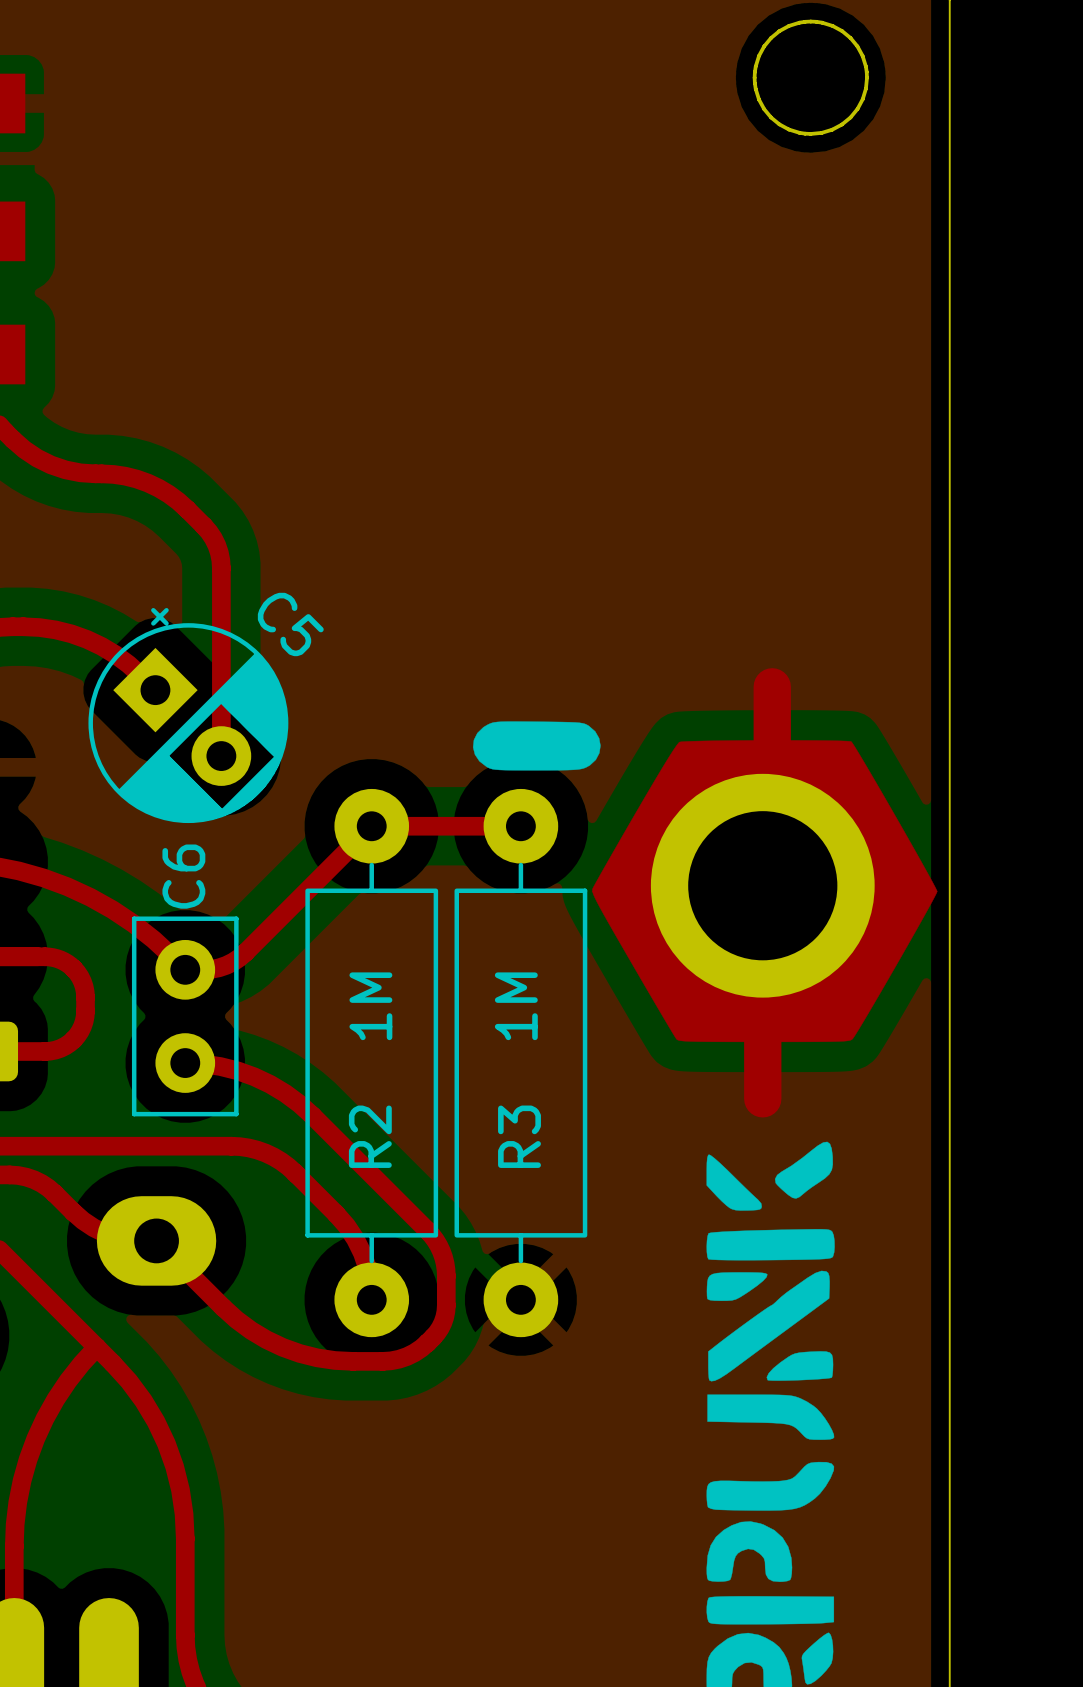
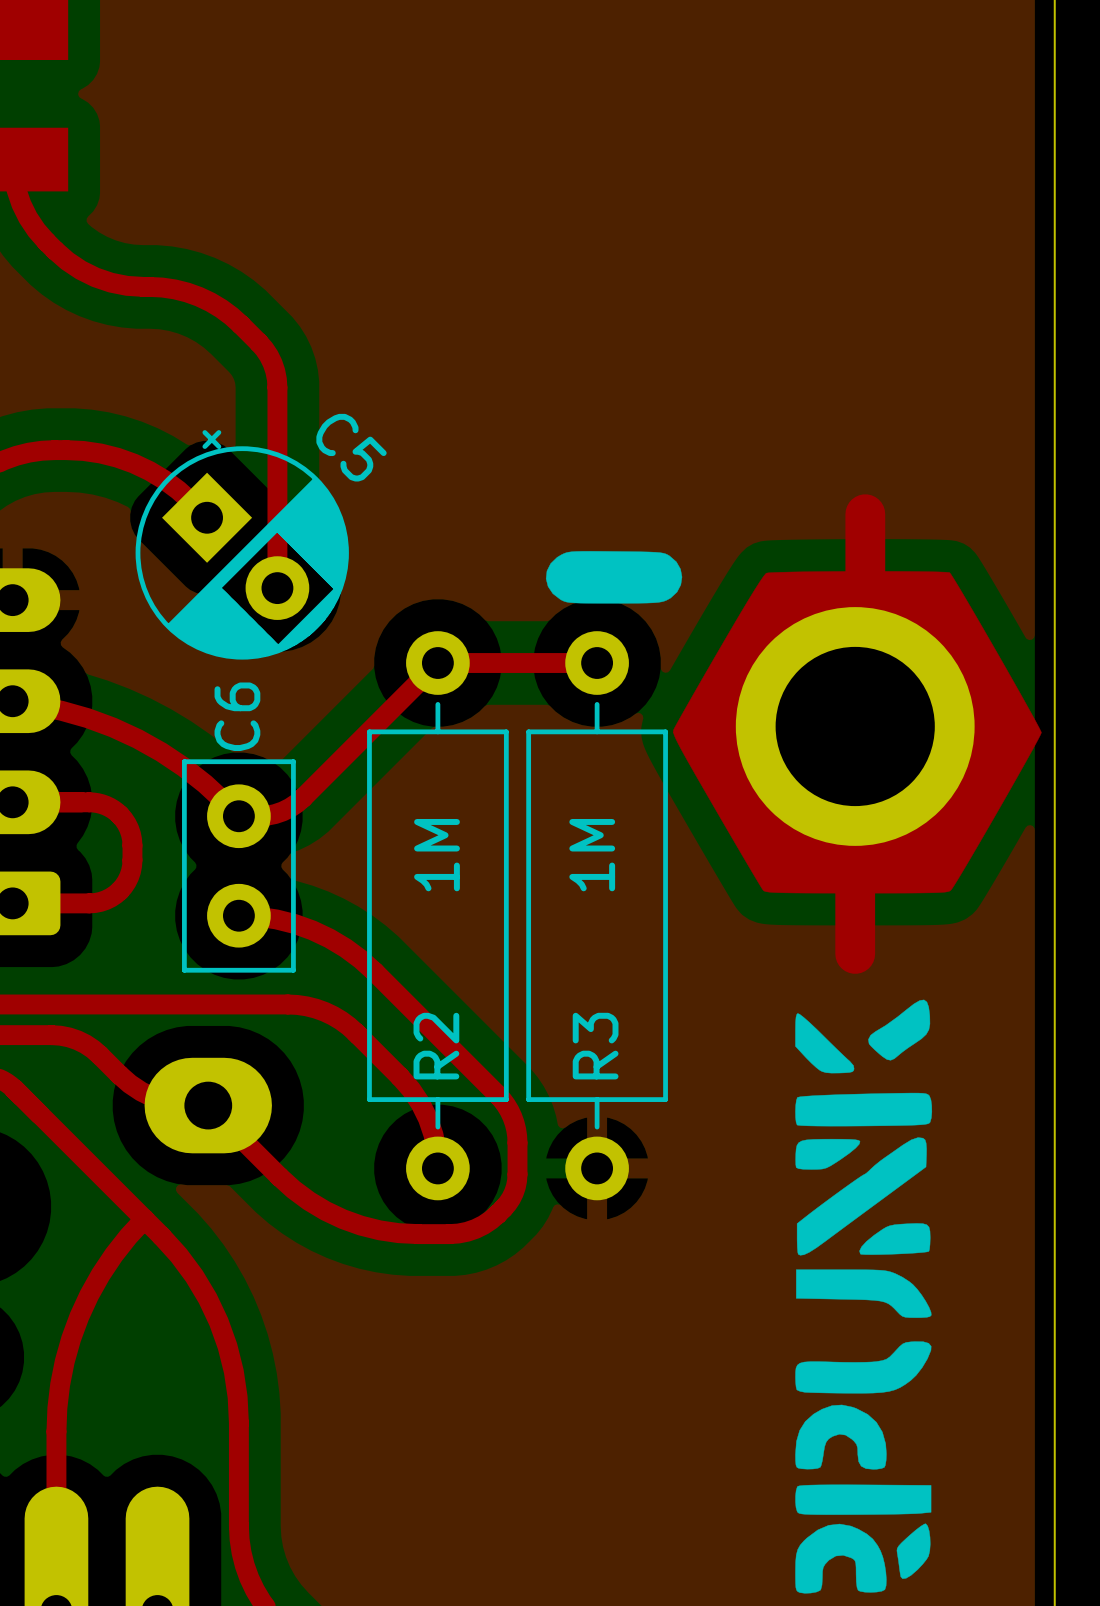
R2 footprint: [305, 788, 439, 1338] -> [367, 631, 509, 1201]
R3 footprint: [454, 788, 588, 1338] -> [526, 631, 668, 1201]
R2 name position: R2 (370, 1136) -> R2 (436, 1046)
R3 name position: R3 (519, 1136) -> R3 (595, 1046)

